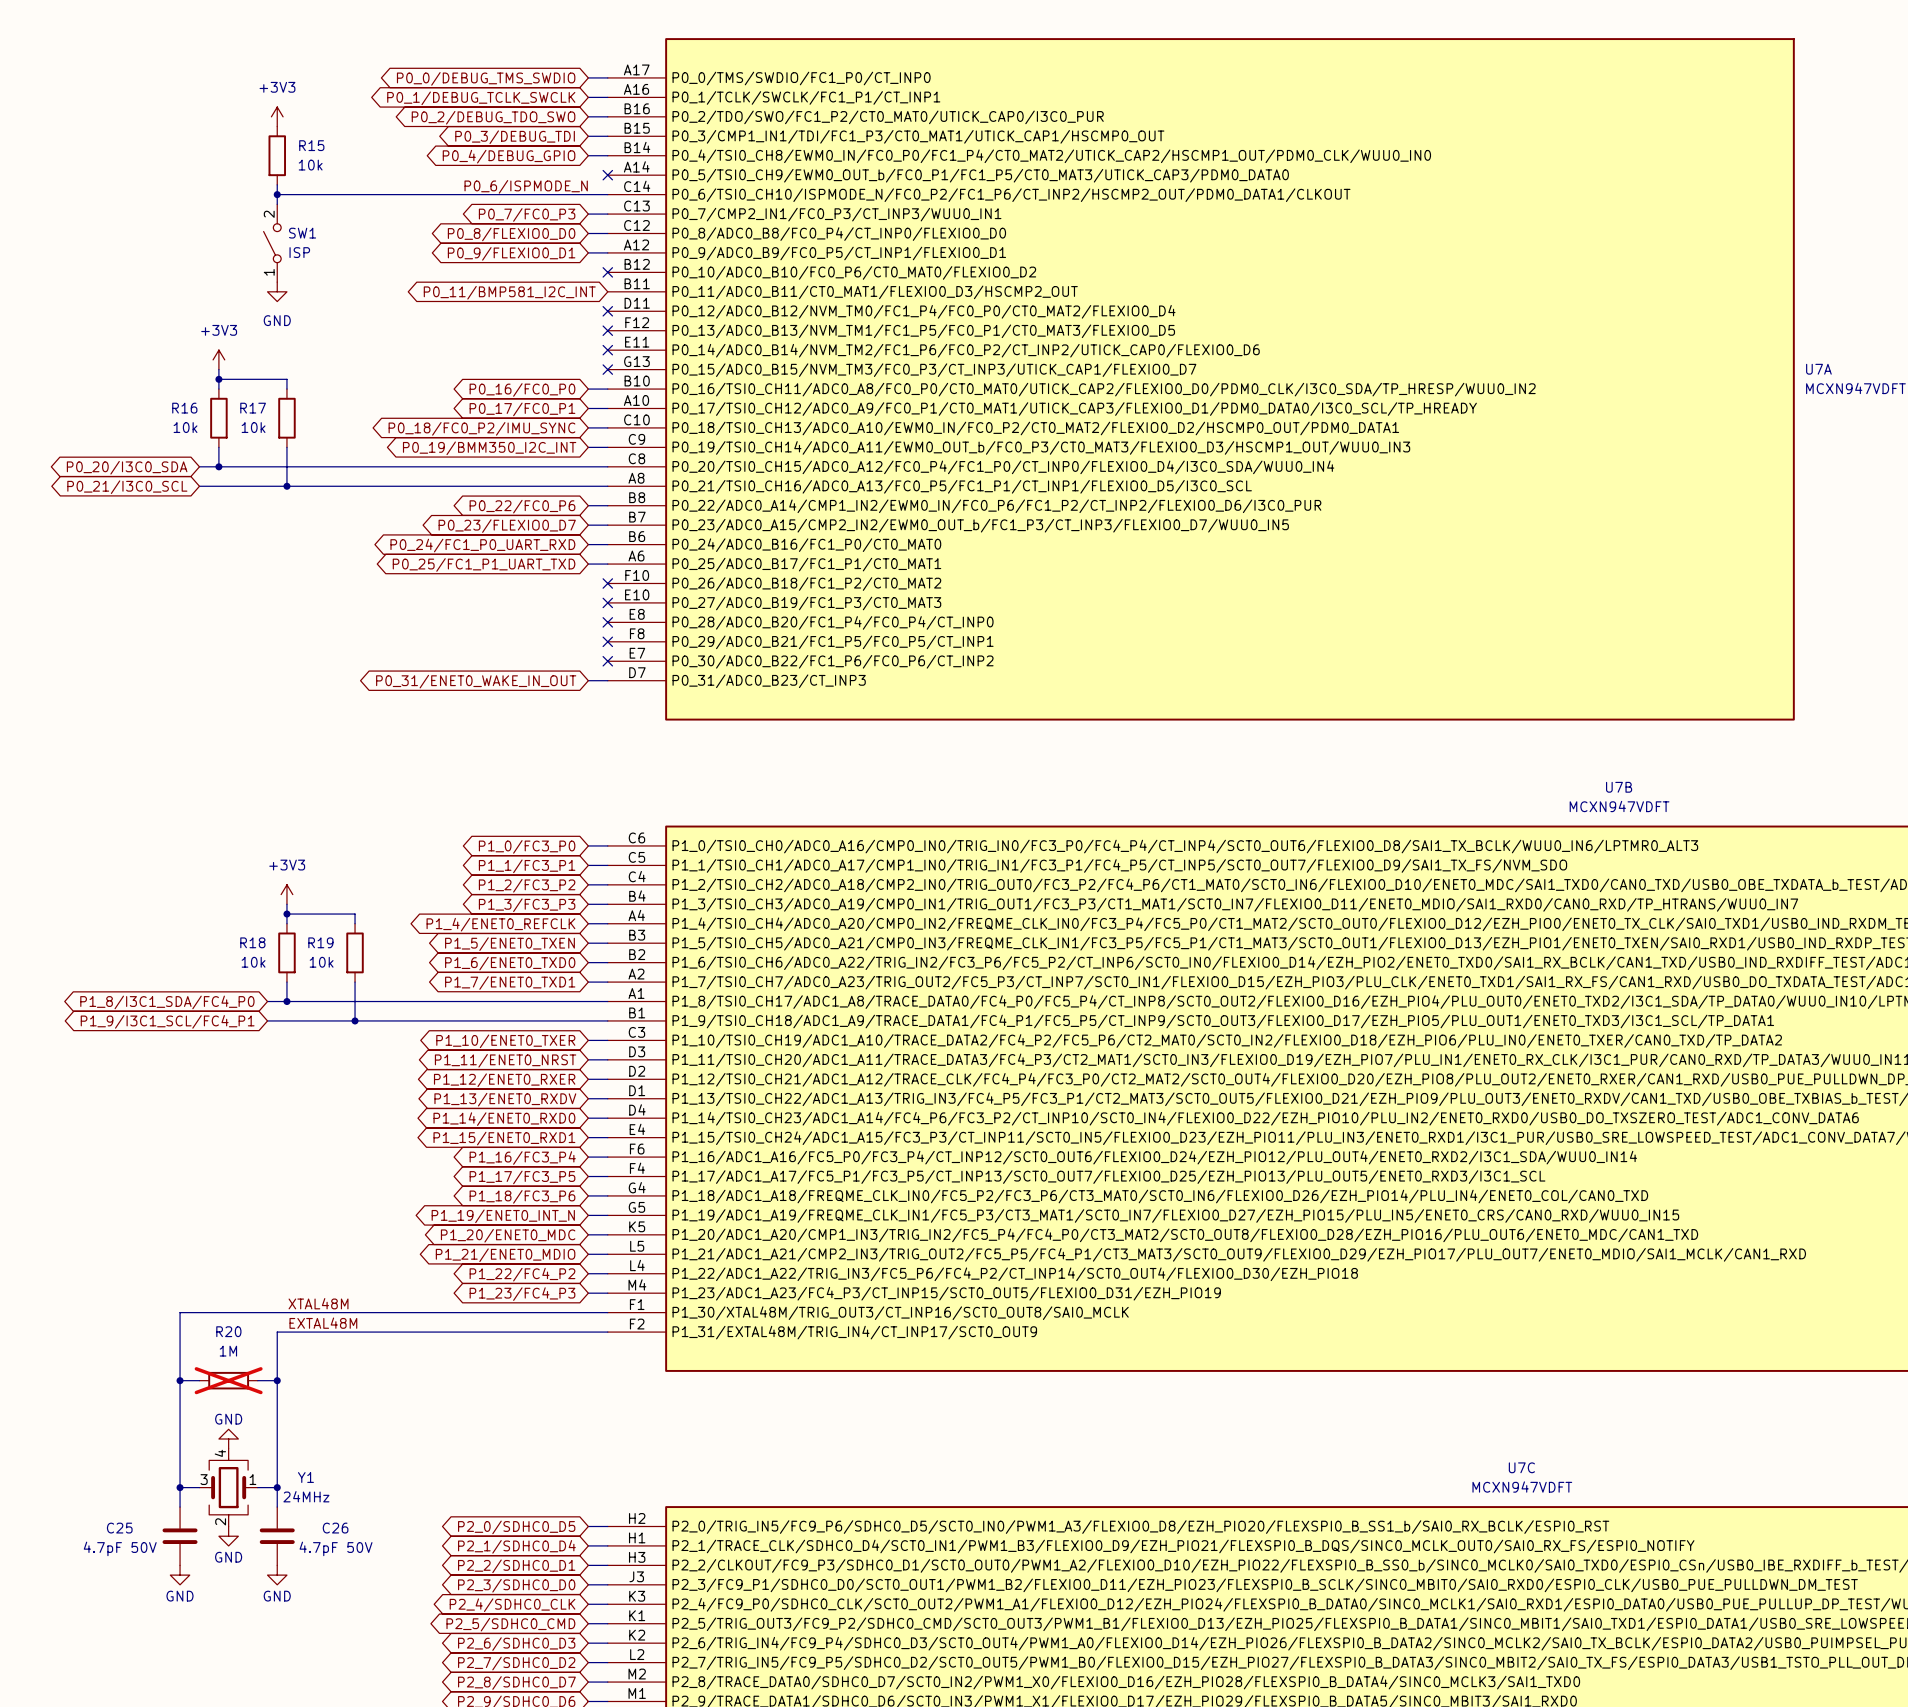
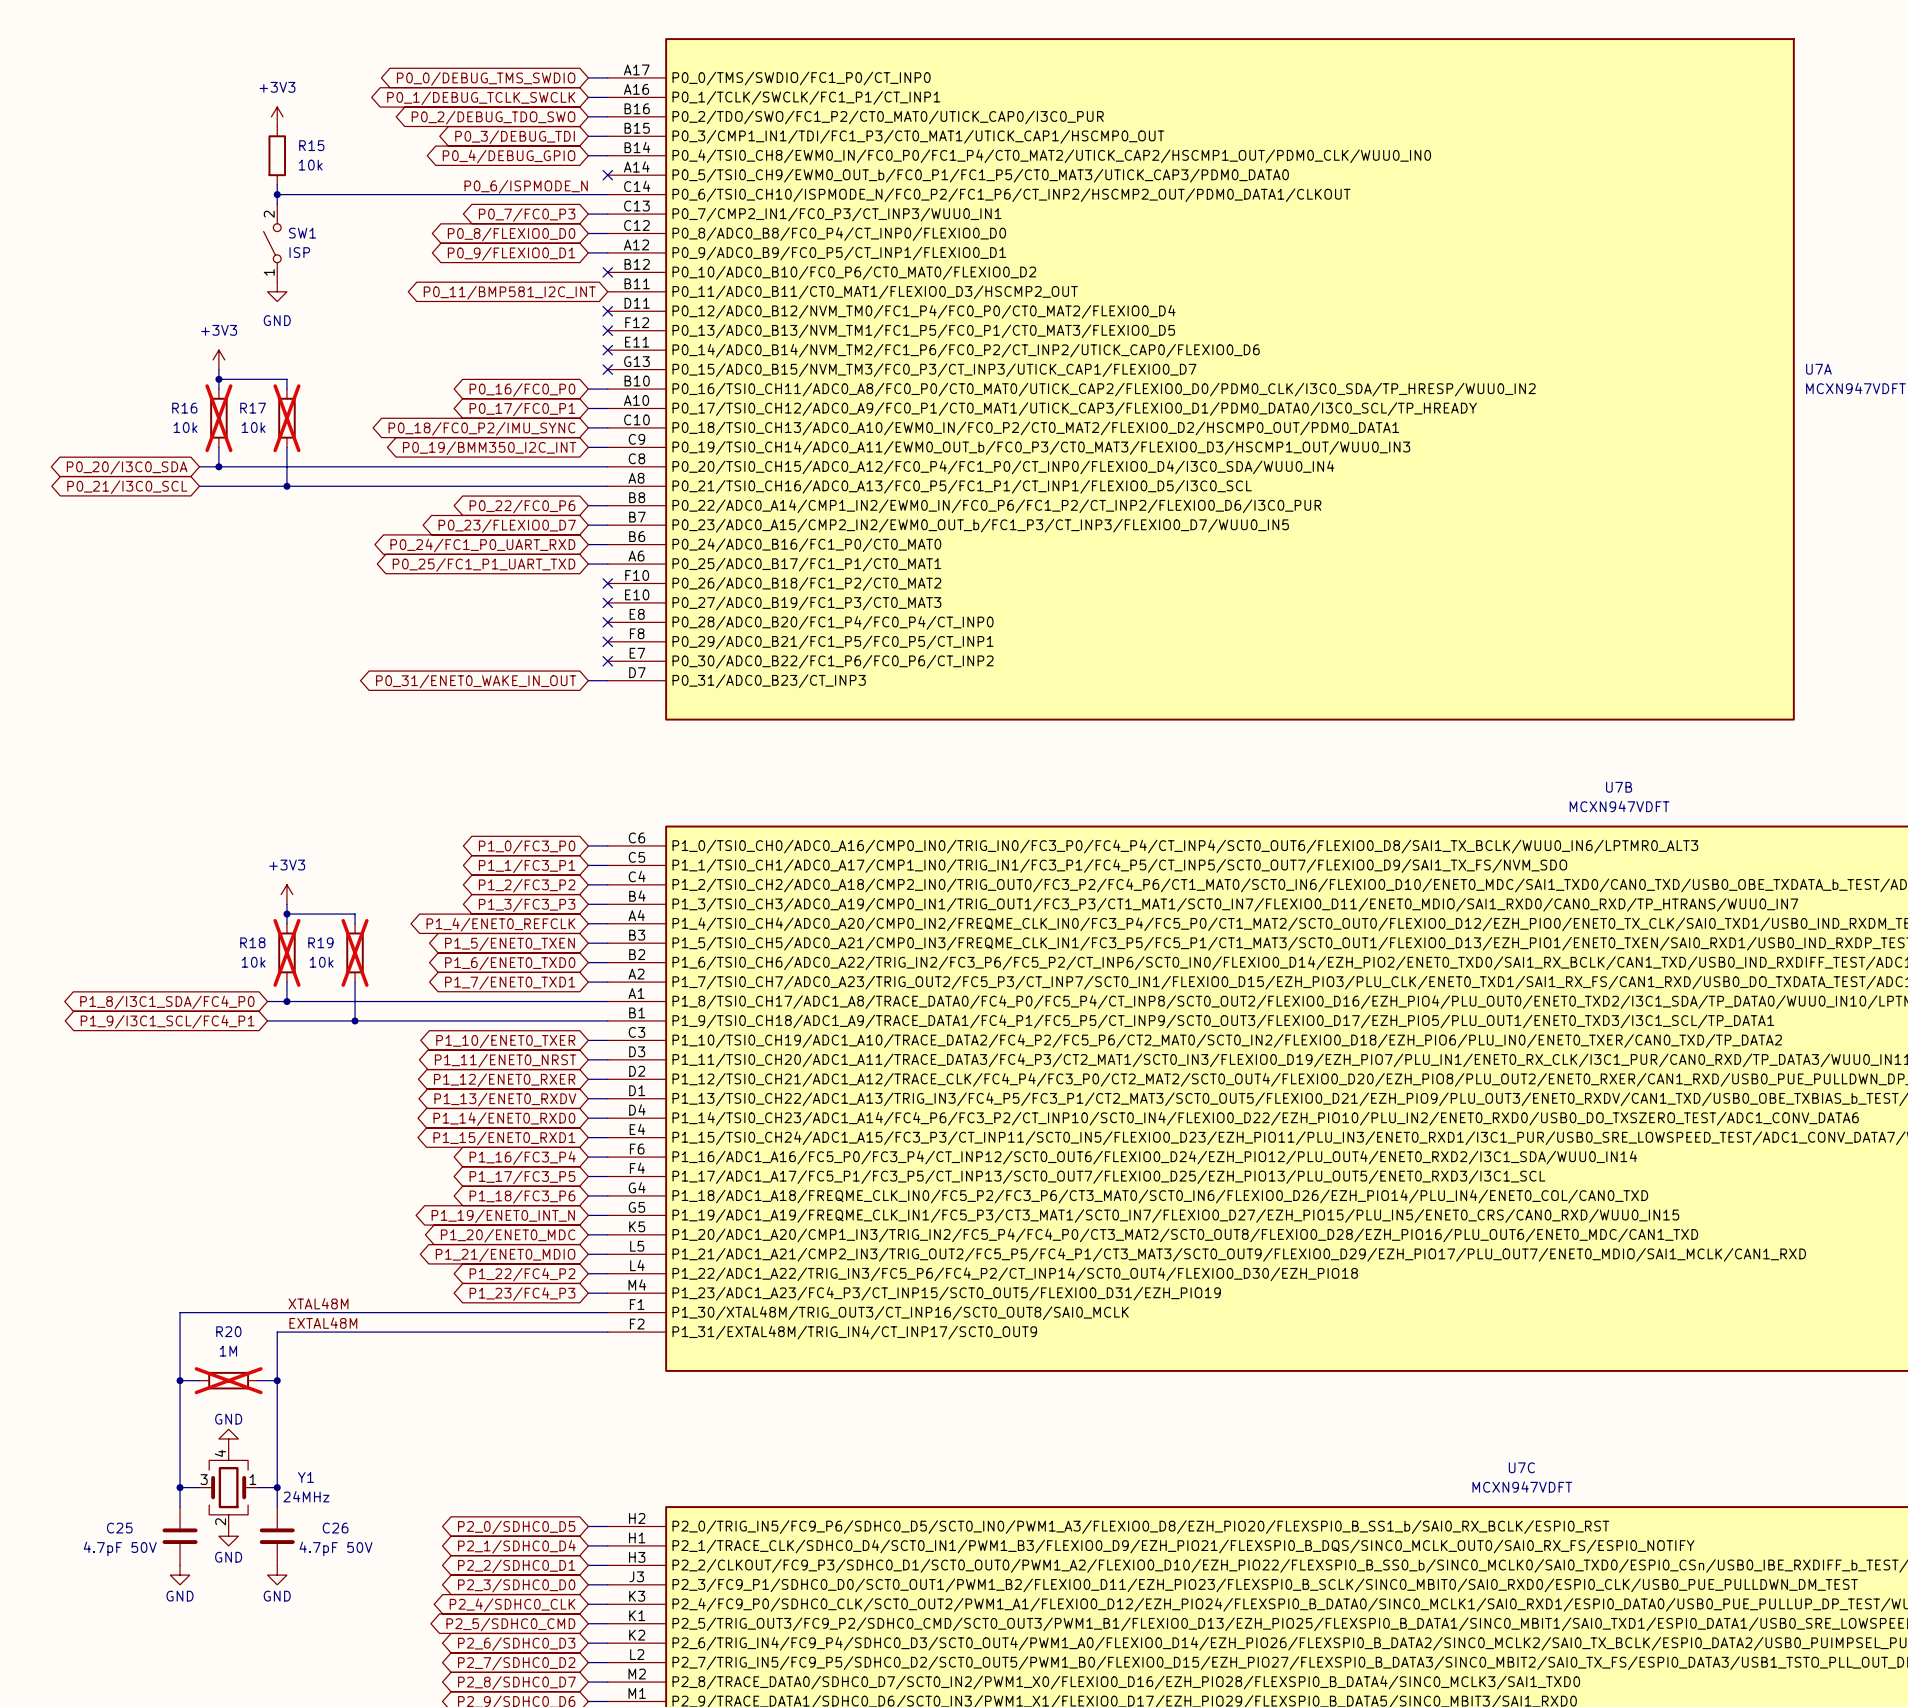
R16 do-not-place cross: none -> (218, 418)
R17 do-not-place cross: none -> (286, 418)
R18 do-not-place cross: none -> (286, 952)
R19 do-not-place cross: none -> (355, 952)

